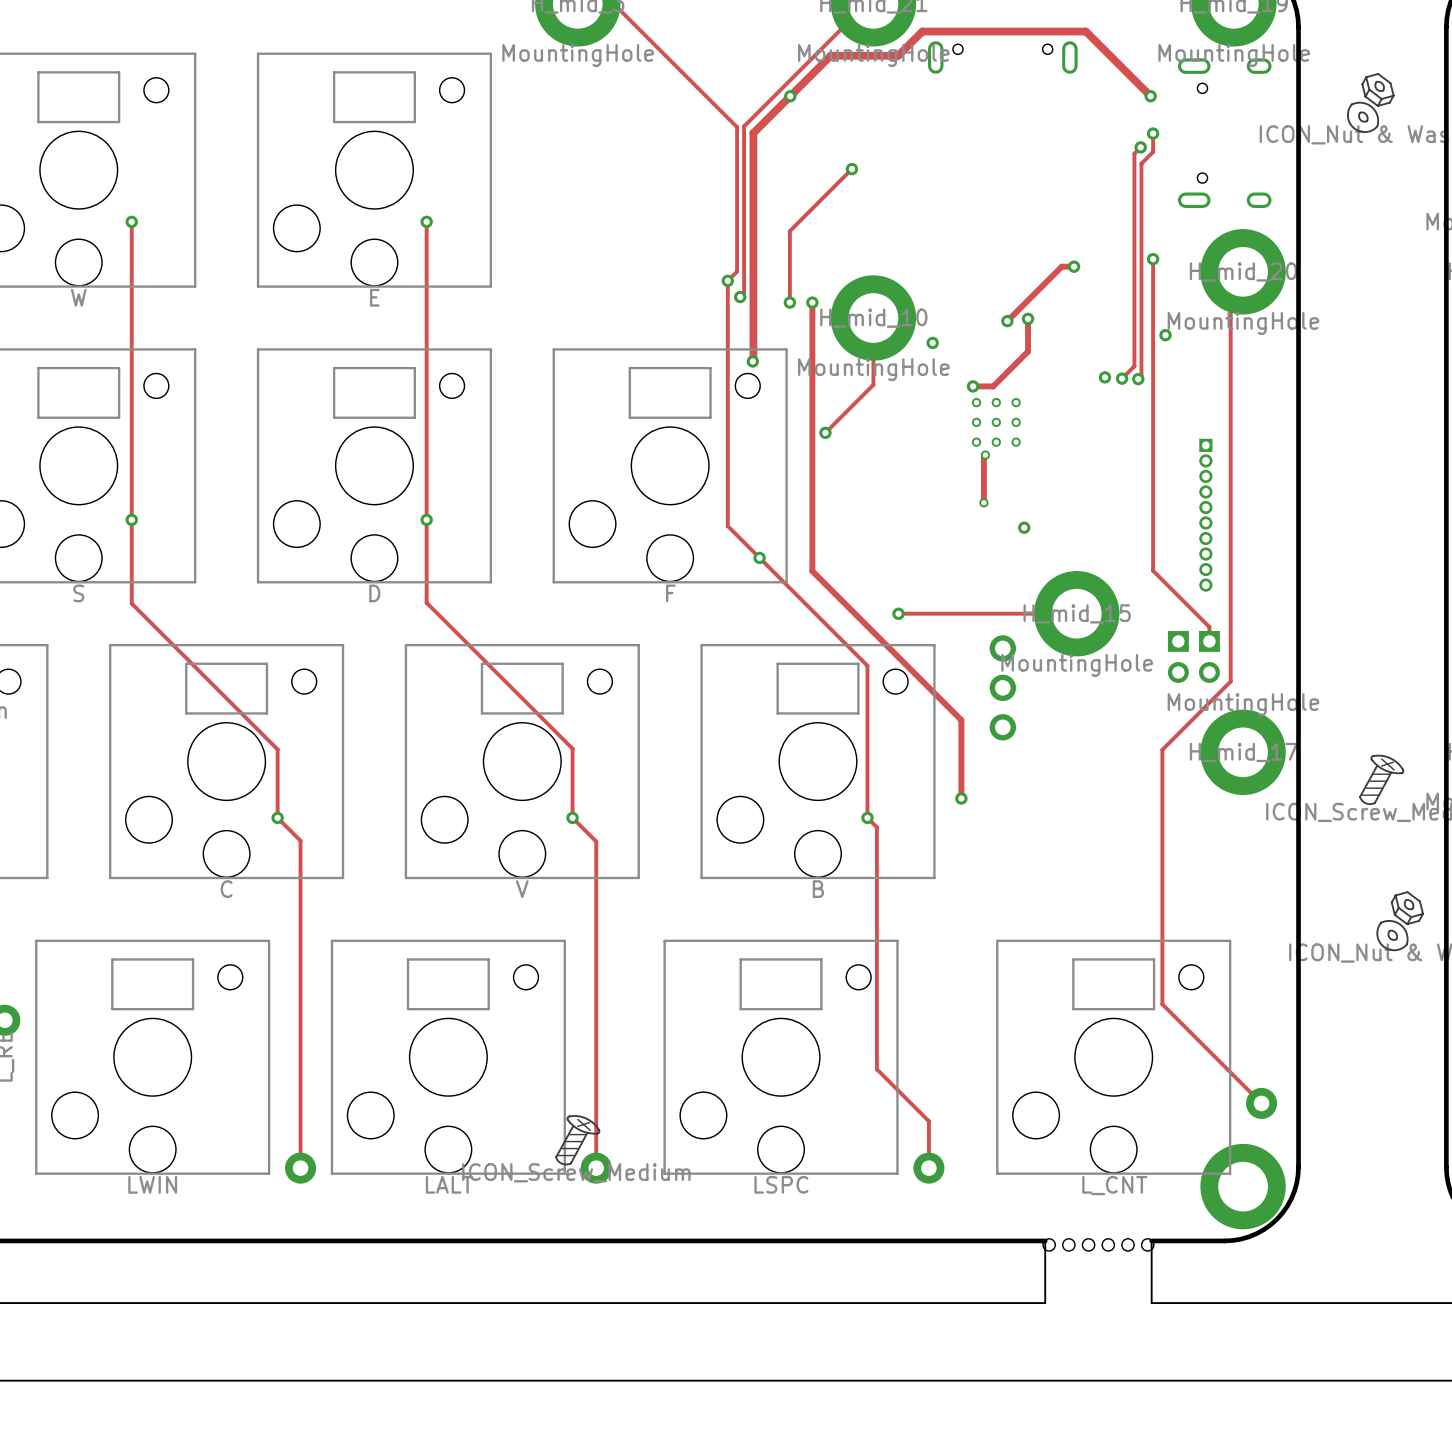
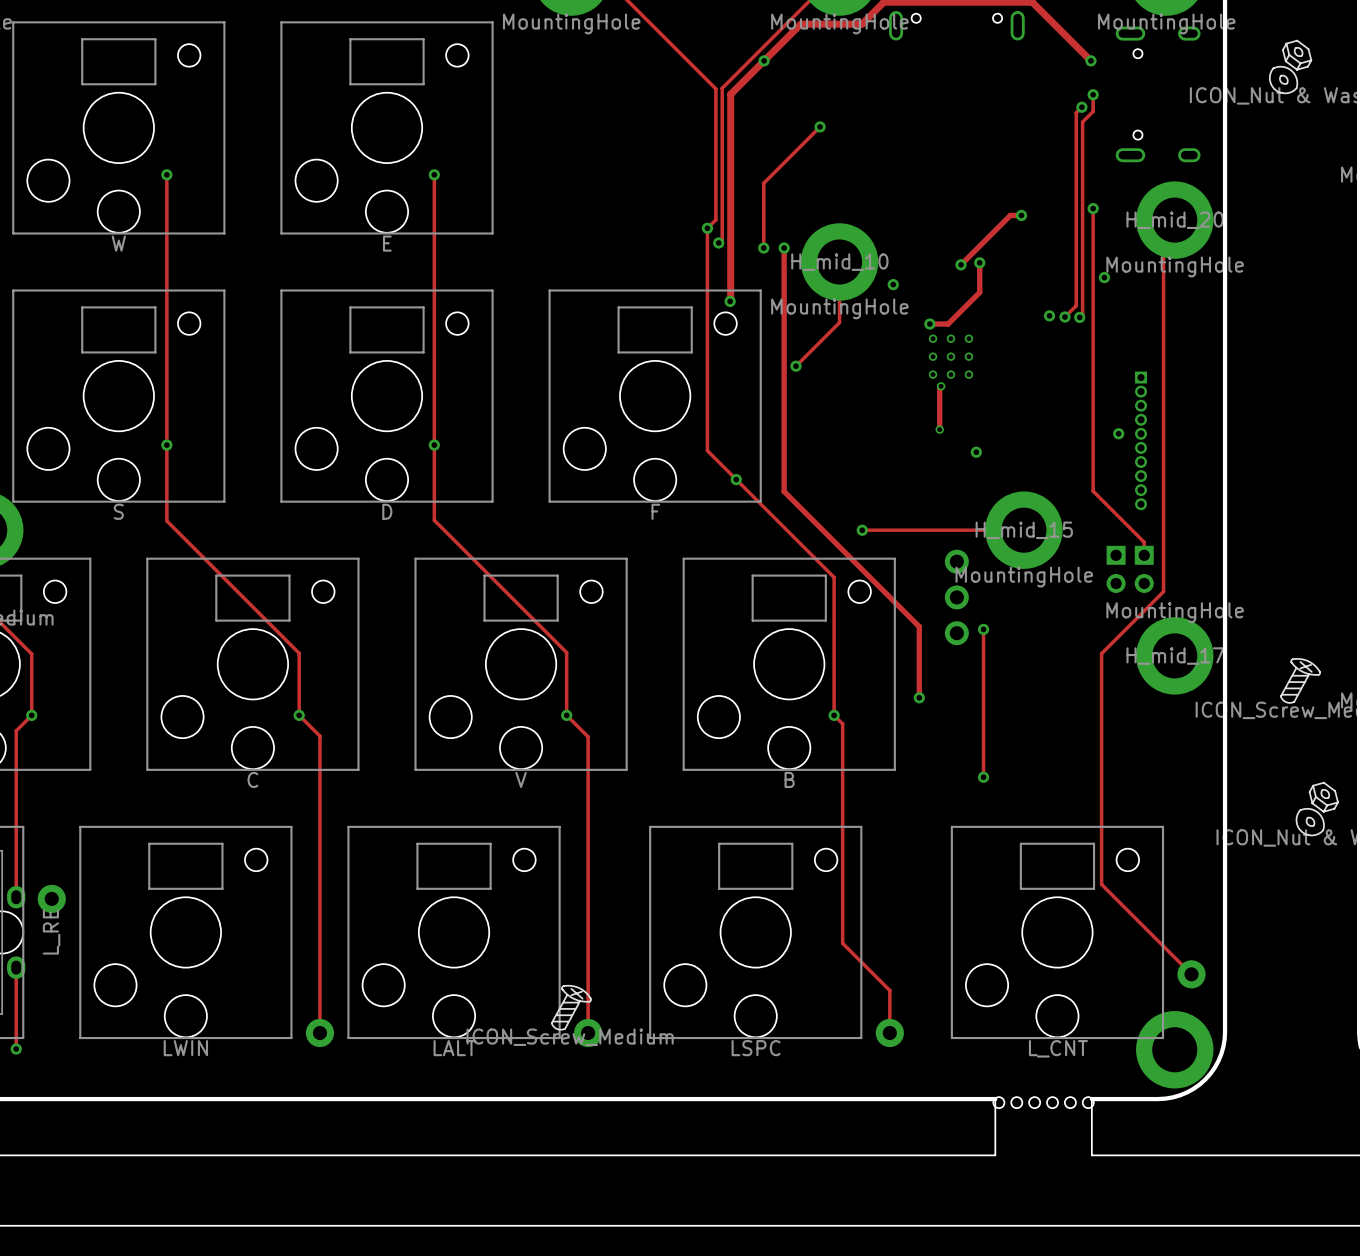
via: none -> (1118, 433)
track: none -> (983, 629) (983, 777)
via: none -> (983, 629)
via: none -> (983, 777)

